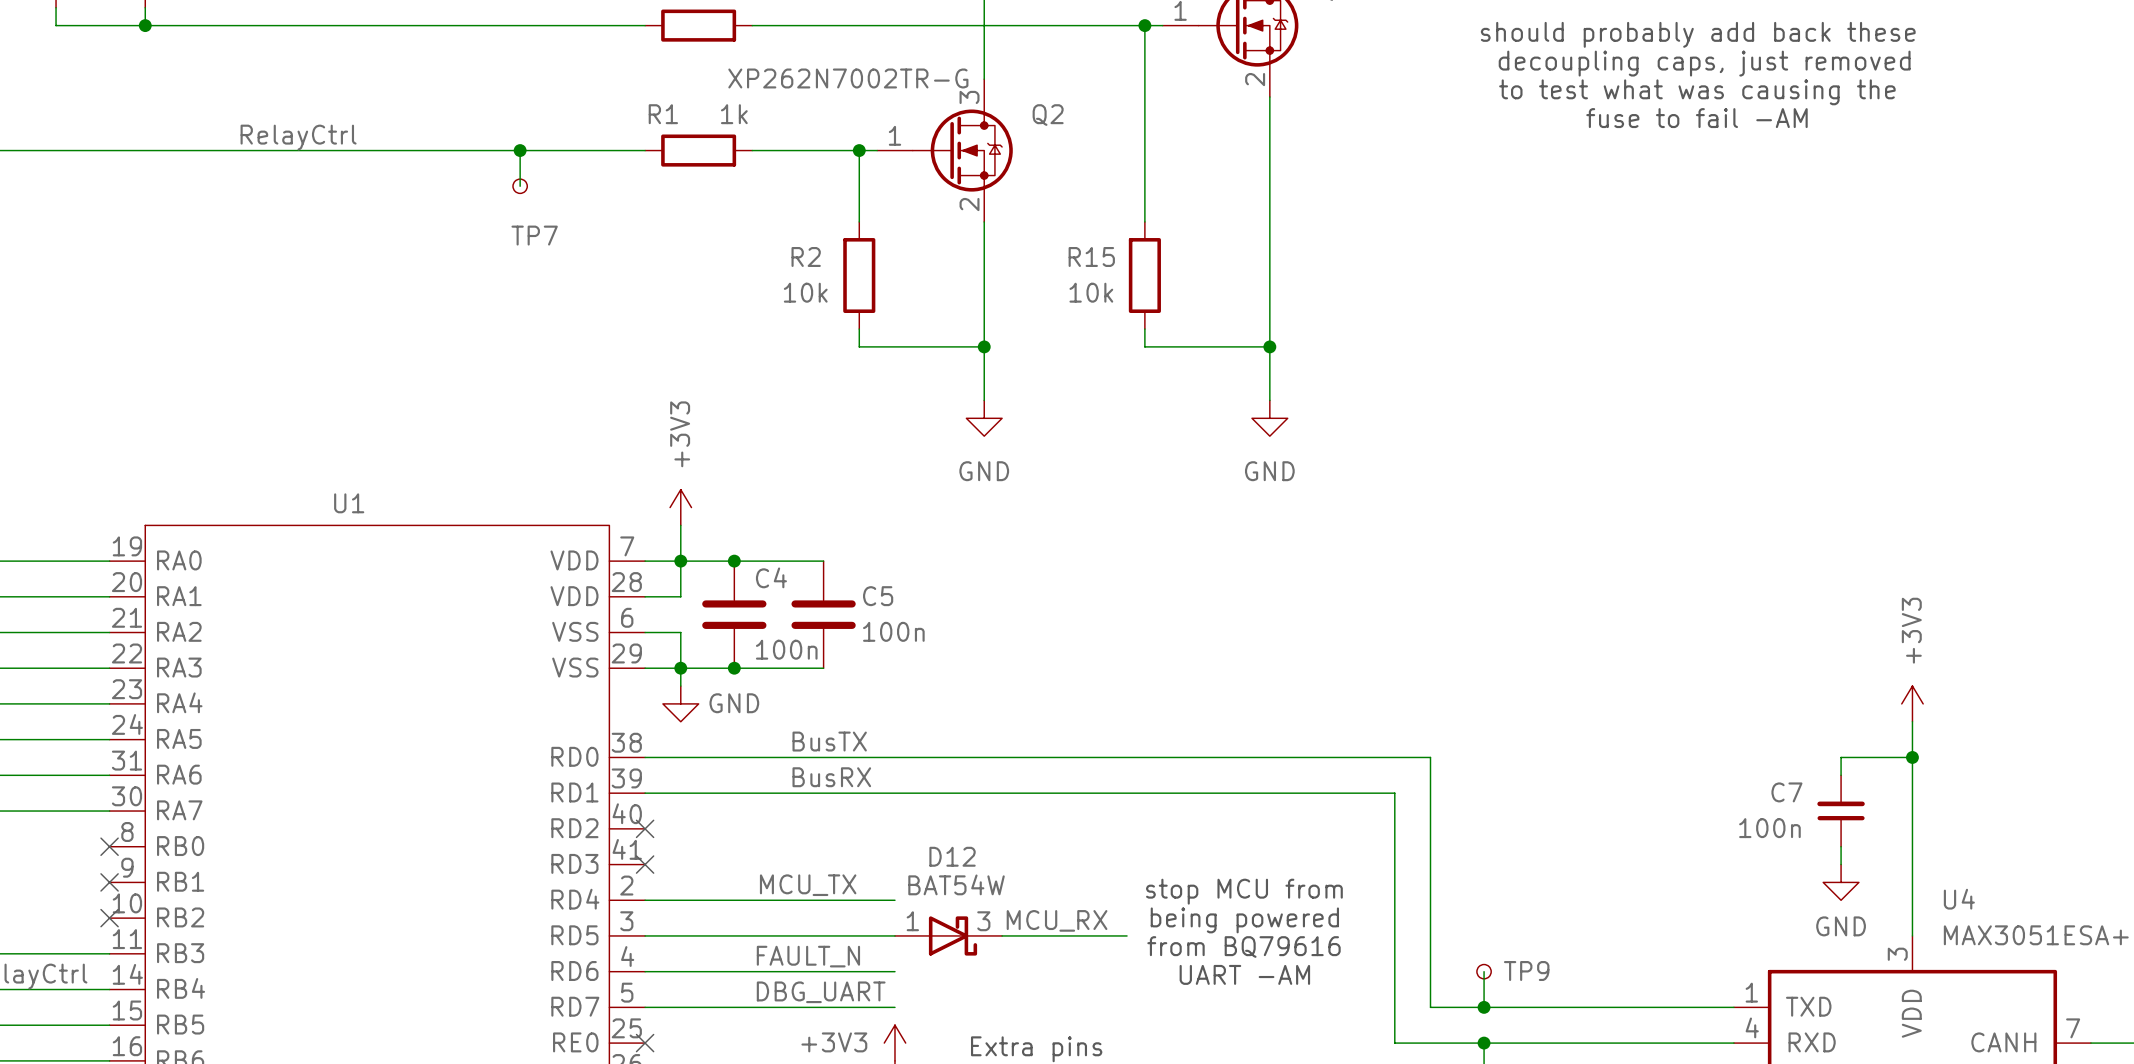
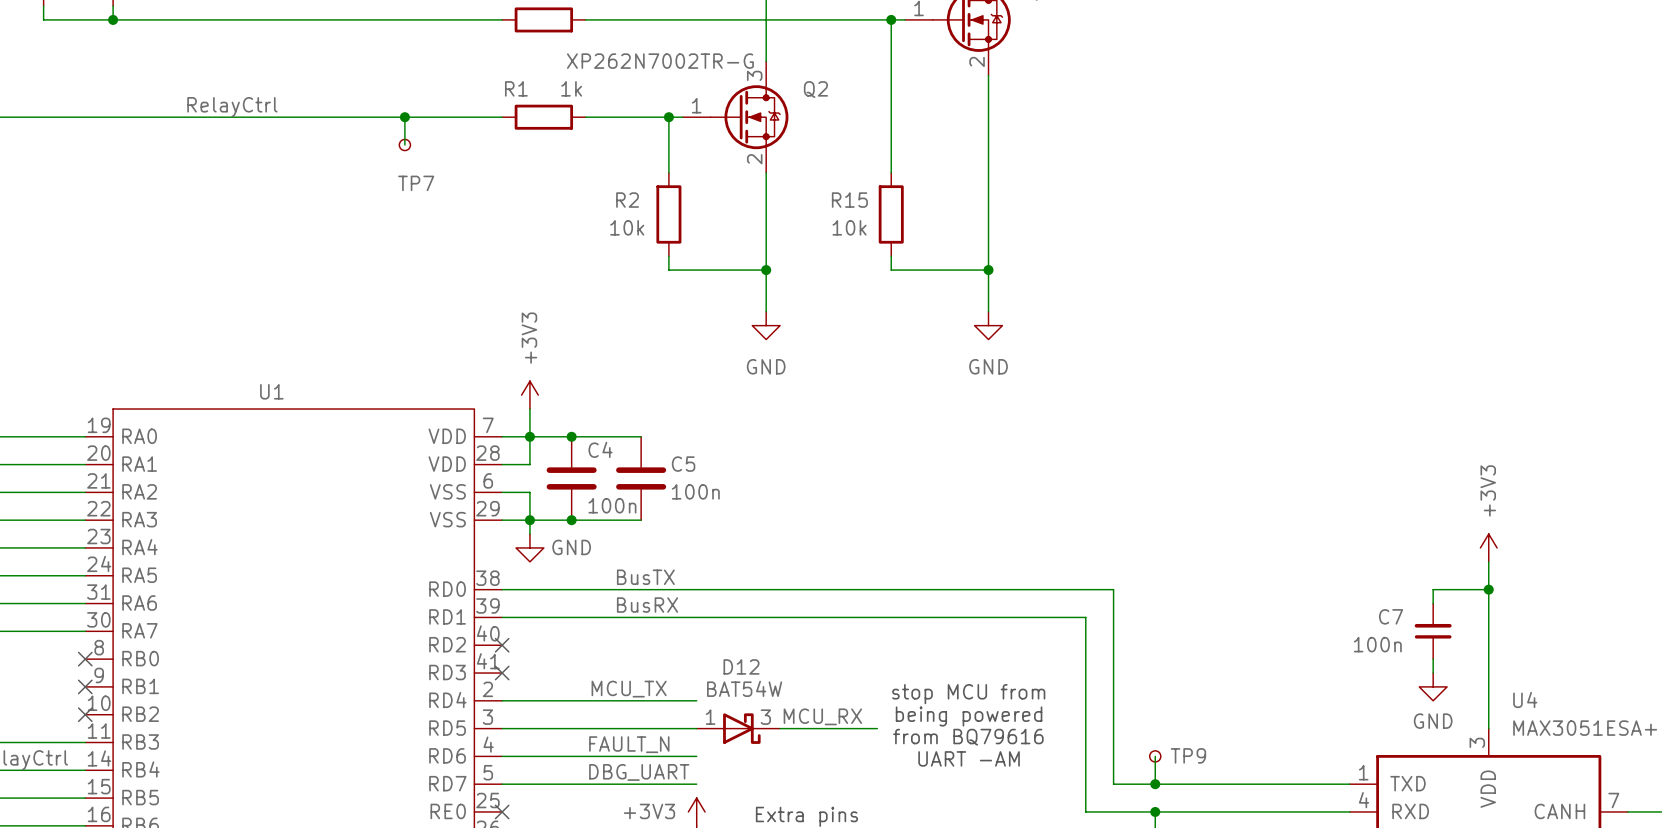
text: should probably add back these (1698, 34) -> none
text: decoupling caps, just removed (1704, 63) -> none
text: to test what was causing the (1697, 92) -> none
text: fuse to fail -AM (1696, 118) -> none

